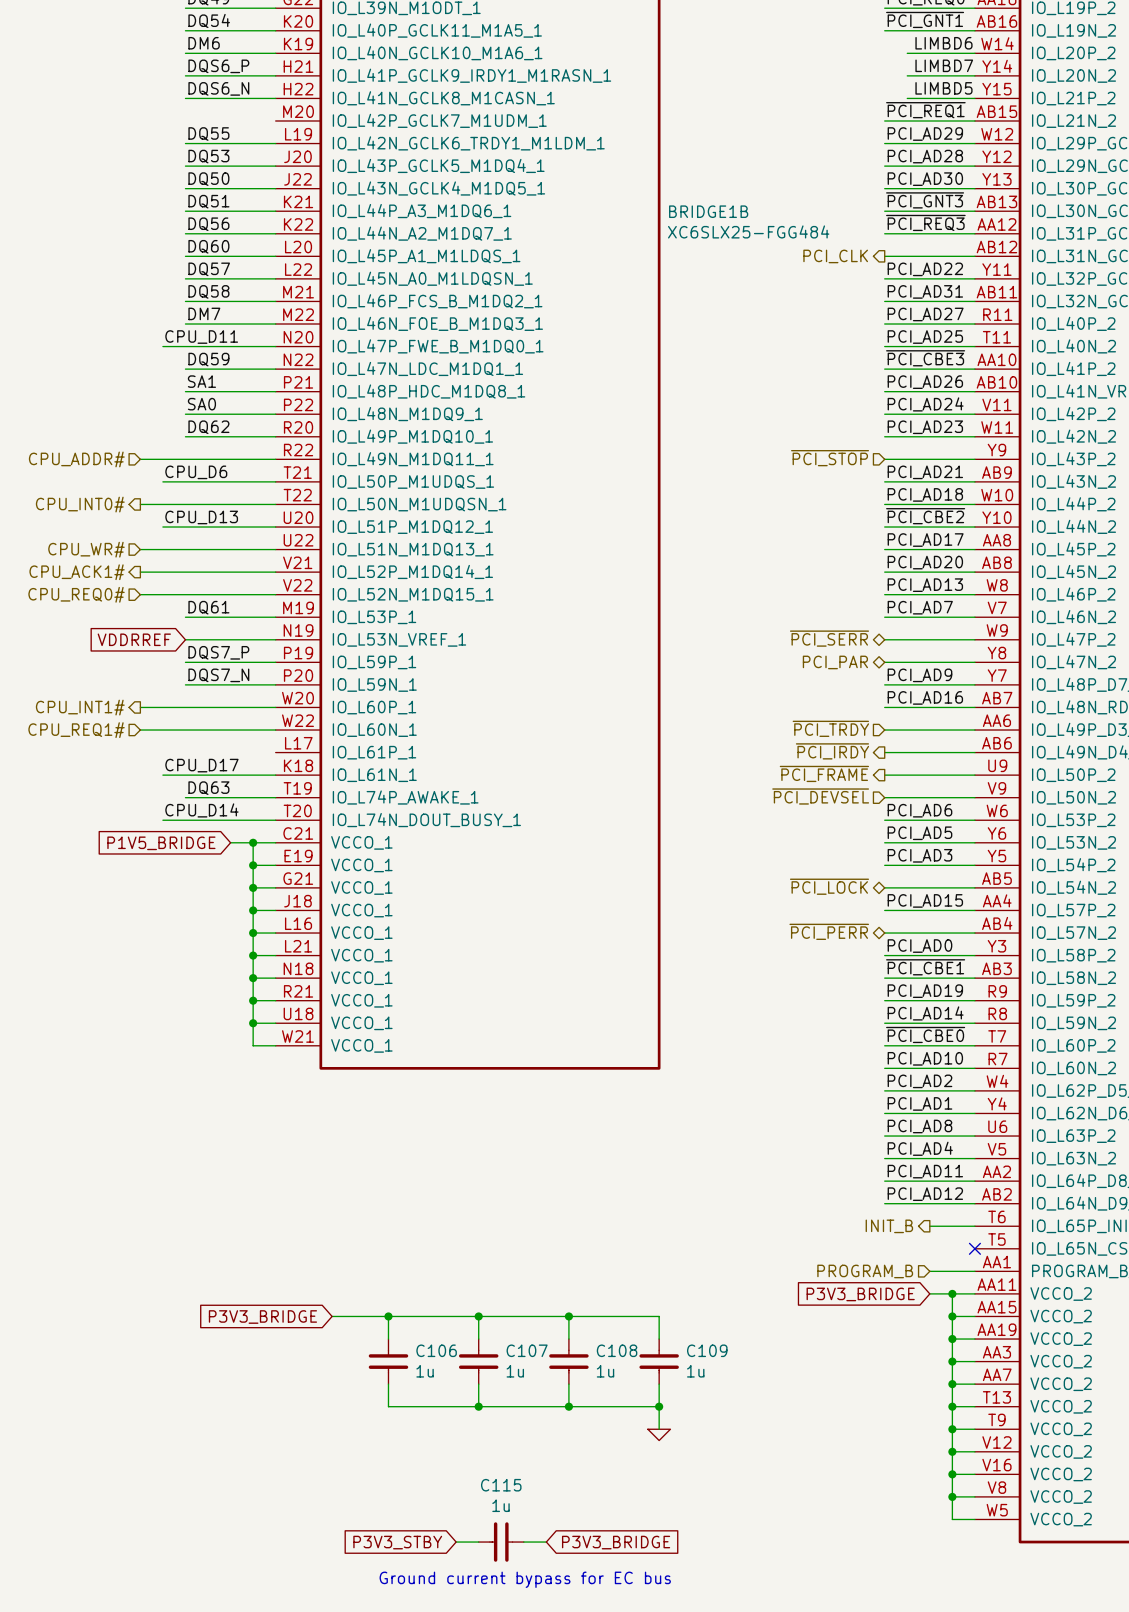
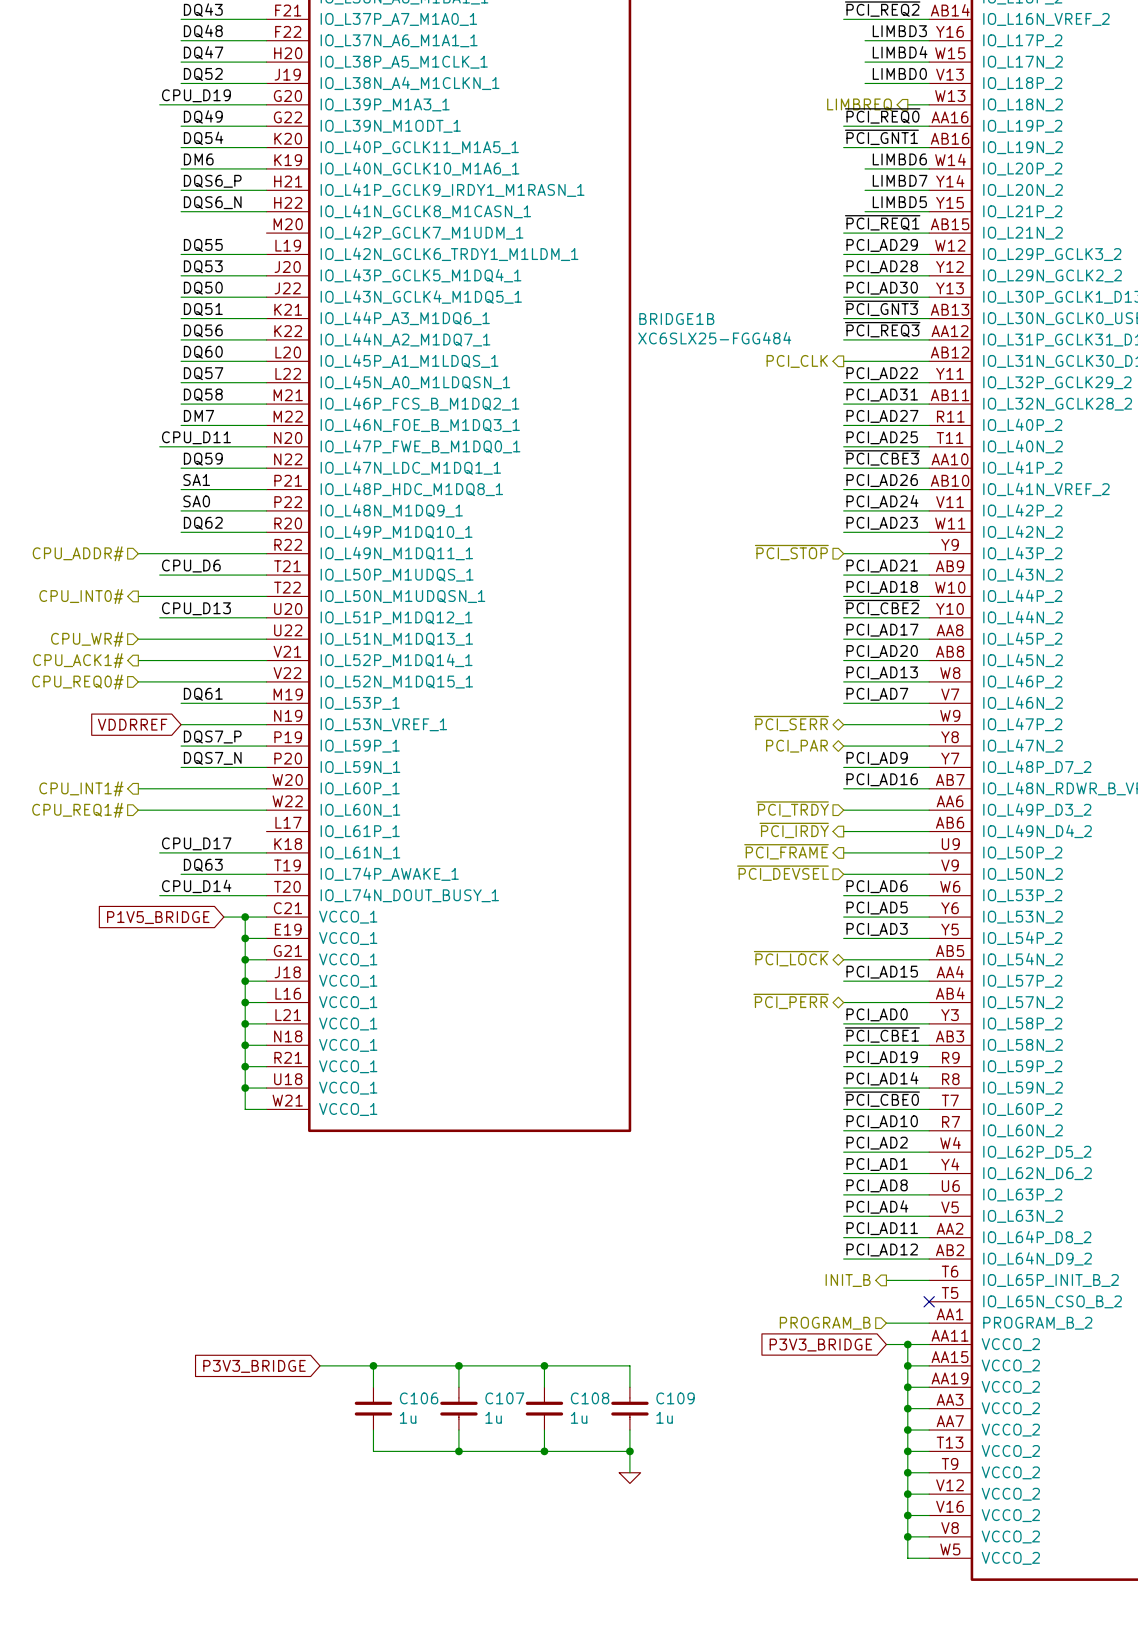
global label: P3V3_STBY (397, 1542) -> none
wire: (456, 1542) (478, 1542) -> none
C115: 1u (501, 1542) -> none
wire: (523, 1542) (546, 1542) -> none
global label: P3V3_BRIDGE (616, 1542) -> none
text: Ground current bypass for EC bus (525, 1579) -> none

